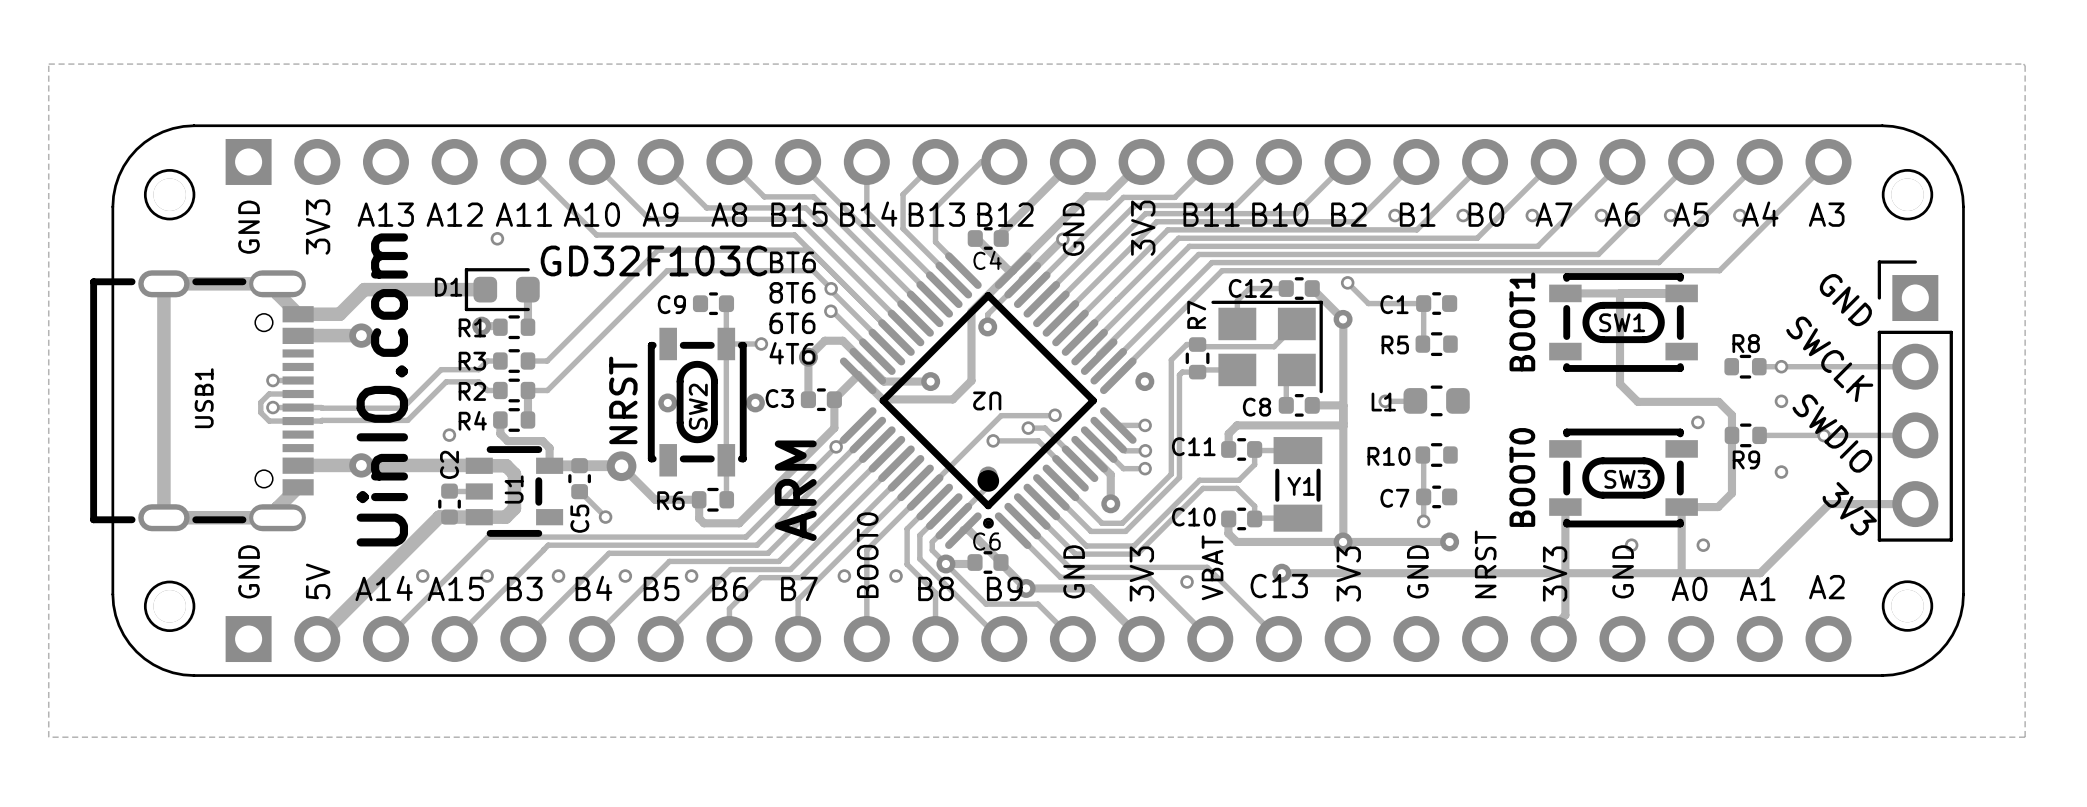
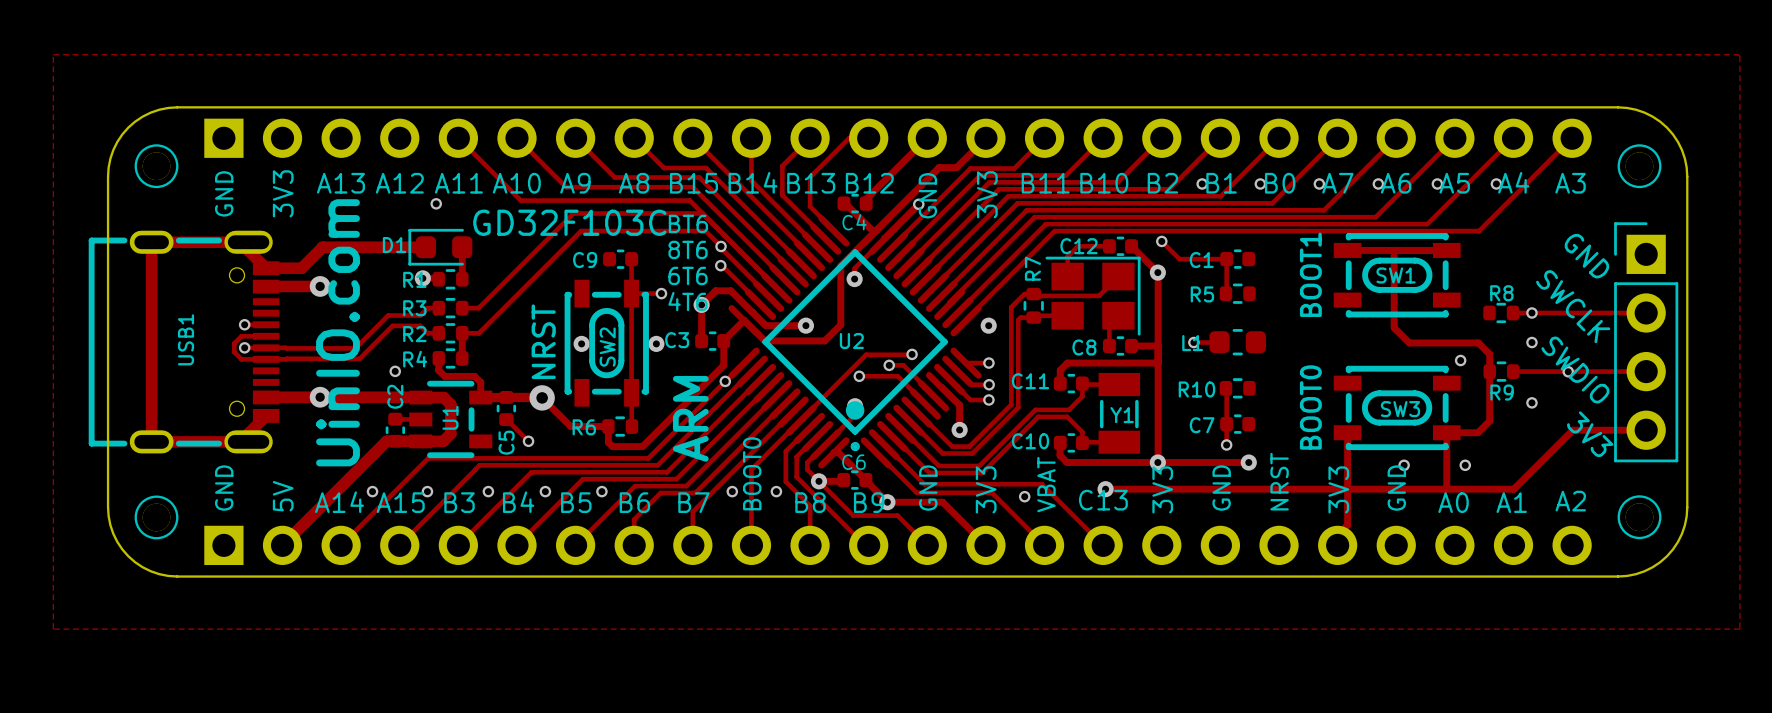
U2 name rotation: 0° (987, 400) -> 180° (851, 341)

